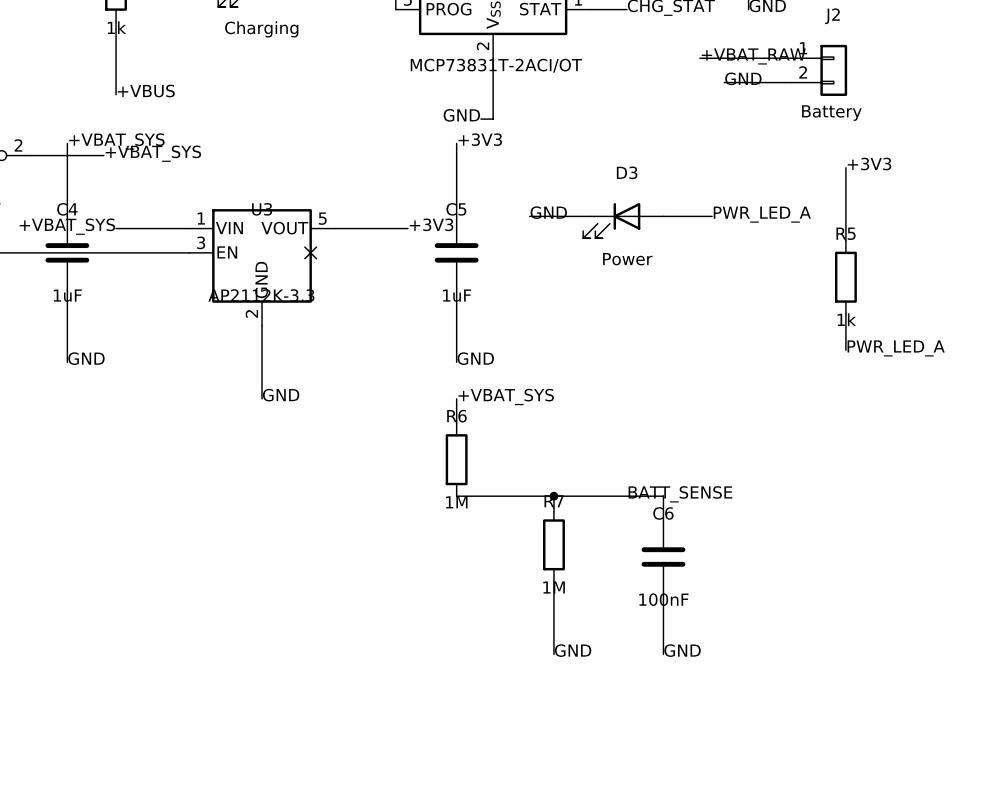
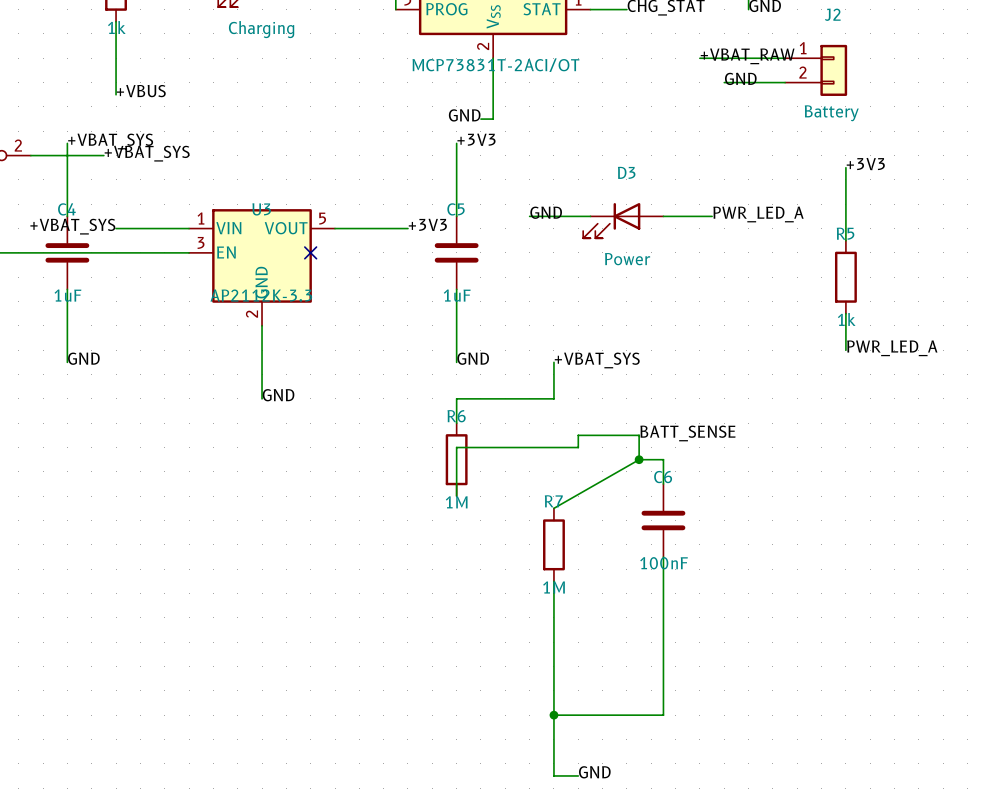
wire: none -> (553, 362) (553, 398) (456, 398)
label position: +VBAT_SYS (506, 396) -> +VBAT_SYS (597, 360)
wire: none -> (639, 459) (663, 459) (663, 484)
junction: none -> (639, 459)
label position: BATT_SENSE (680, 494) -> BATT_SENSE (687, 433)
wire: (456, 496) (663, 496) (663, 520) -> (456, 496) (456, 447) (578, 447) (578, 435) (639, 435) (639, 459)
wire: (553, 496) (553, 508) -> (639, 459) (553, 508)
junction: (553, 496) -> none
C6 position: (663, 557) -> (663, 520)
label: GND (573, 650) -> none
label: GND (682, 650) -> none
wire: none -> (553, 654) (553, 775) (578, 775)
wire: none -> (663, 654) (663, 715) (553, 715)
junction: none -> (553, 715)
label: none -> GND (594, 772)

